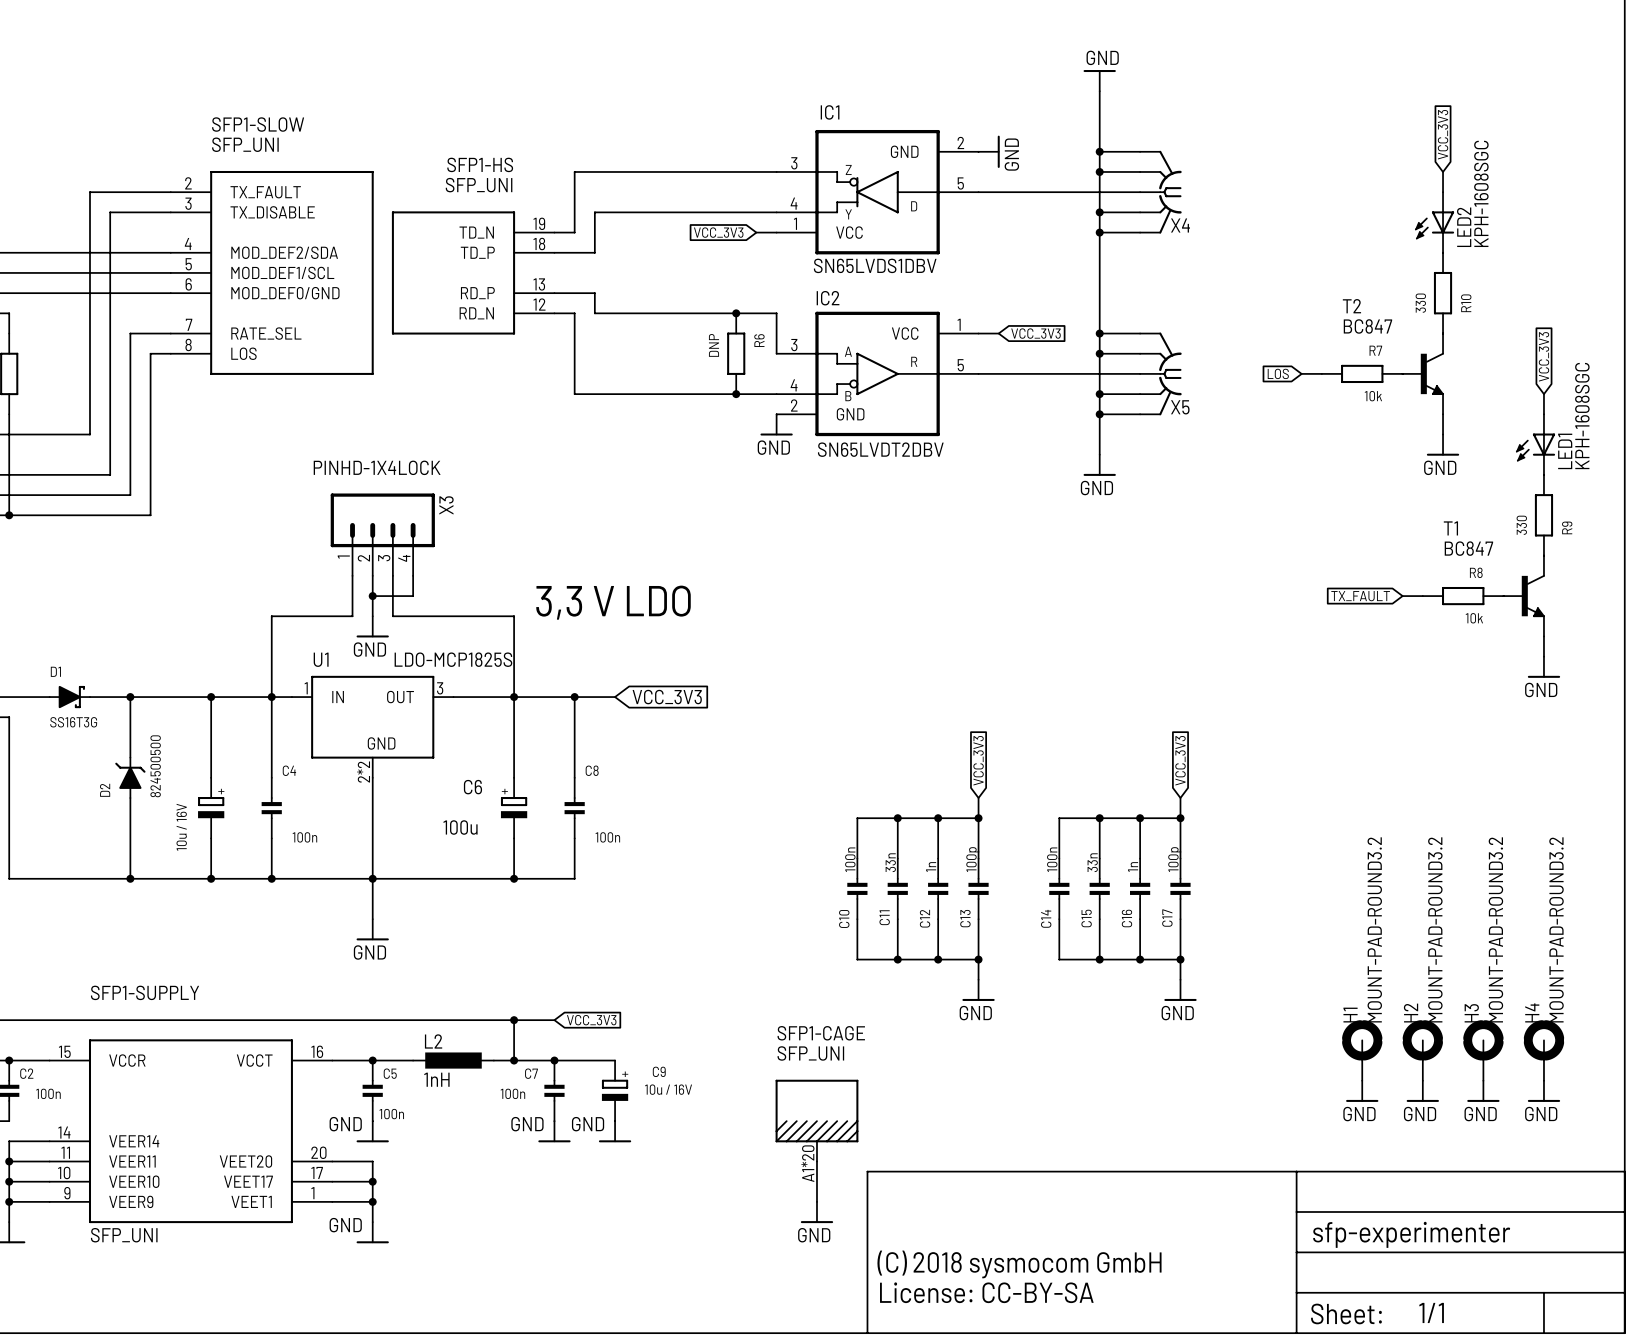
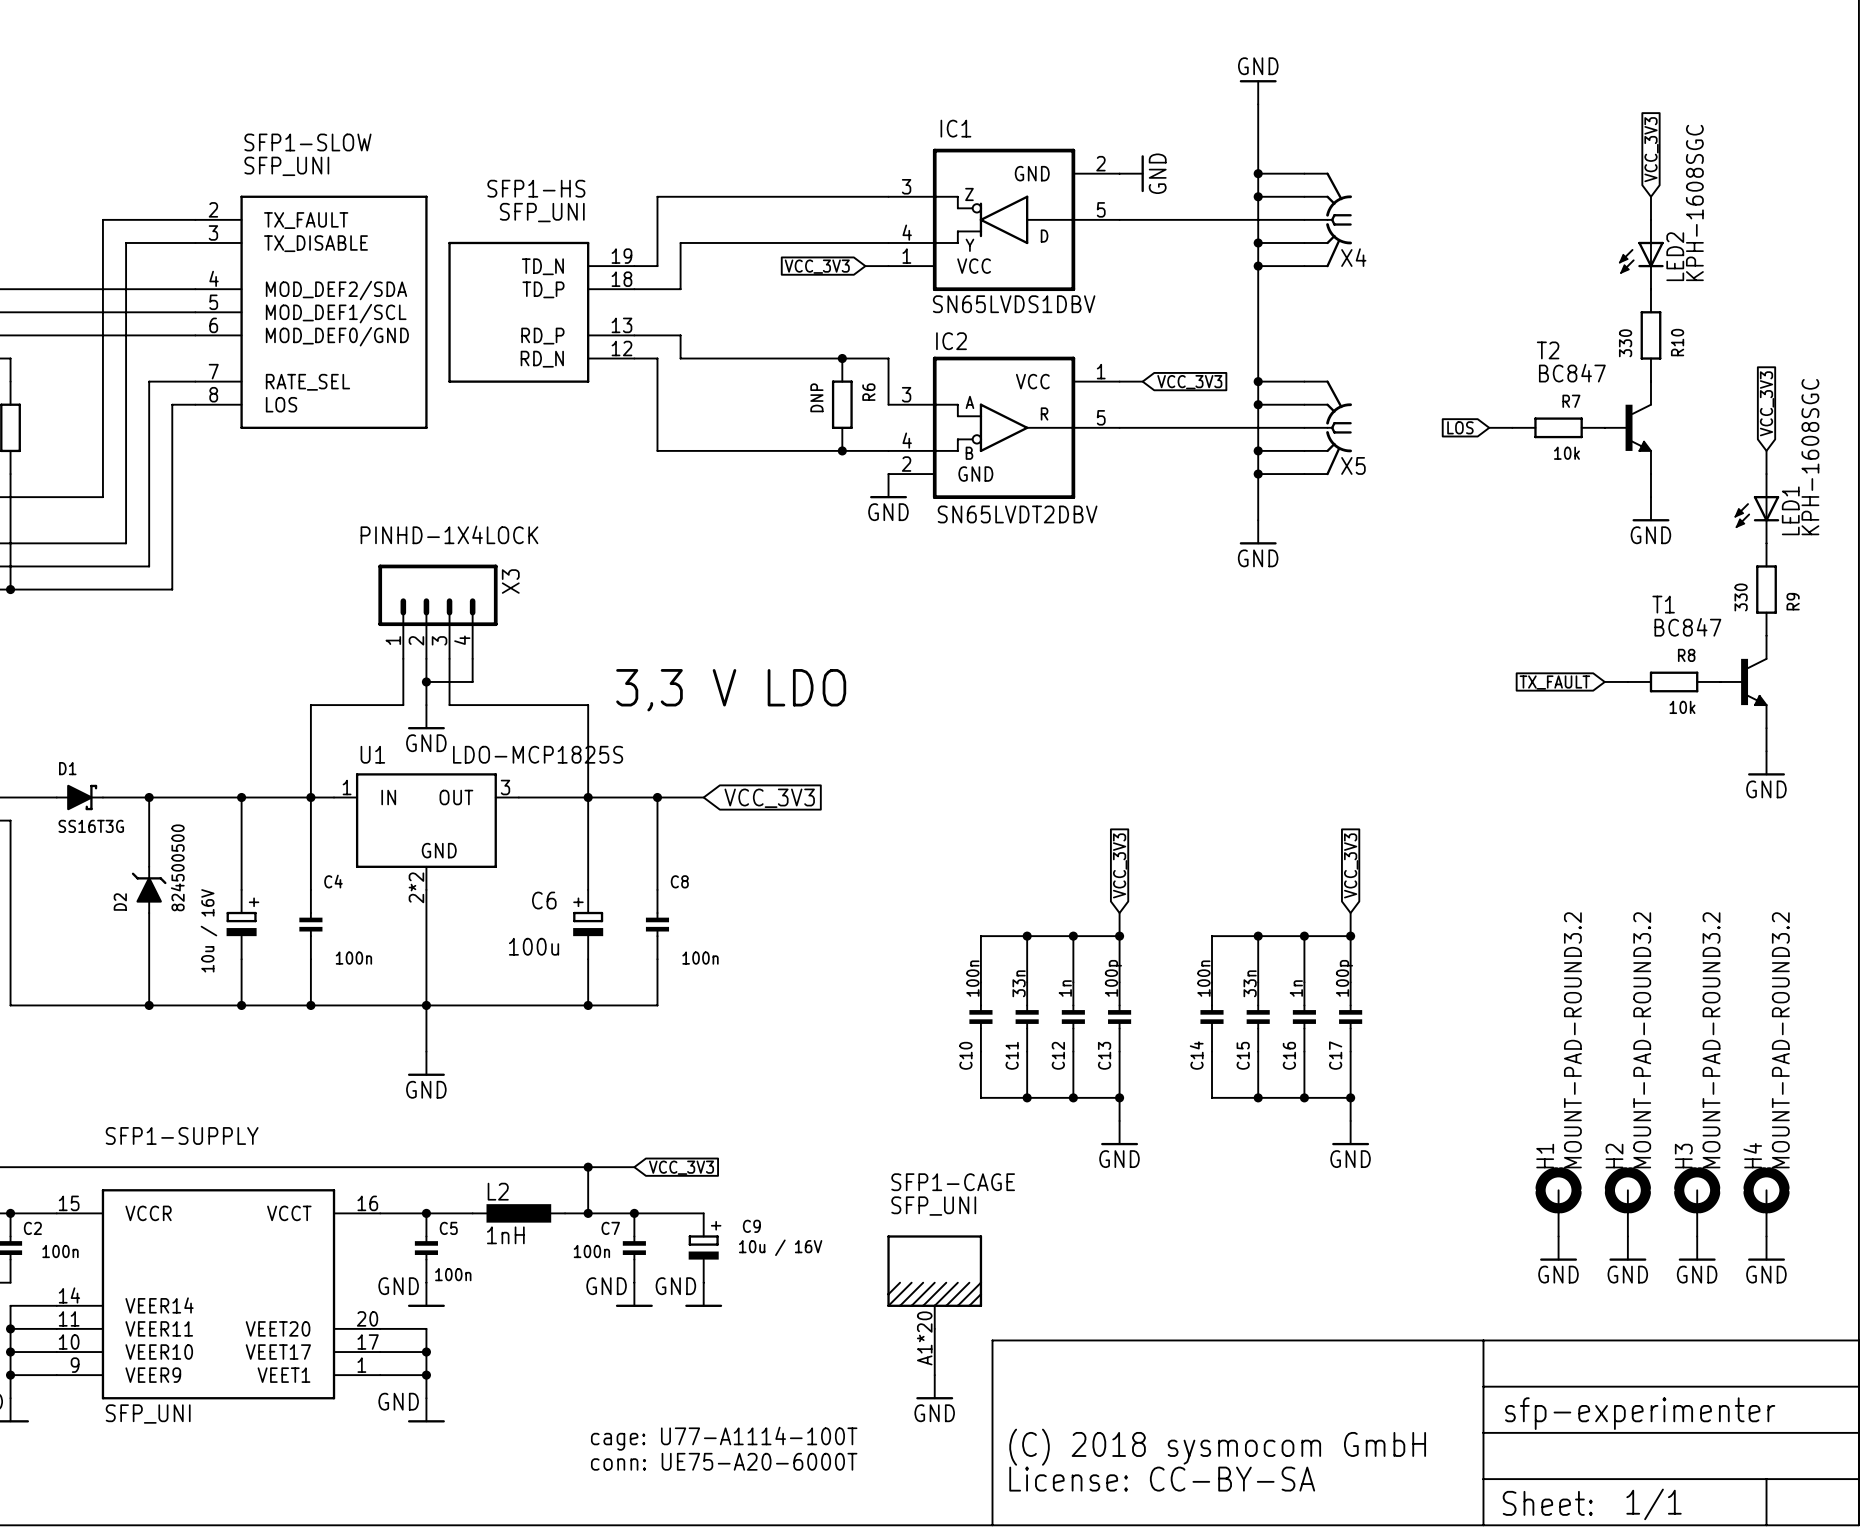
text: none -> cage: U77-A1114-100T (724, 1438)
text: none -> conn: UE75-A20-6000T (724, 1461)

